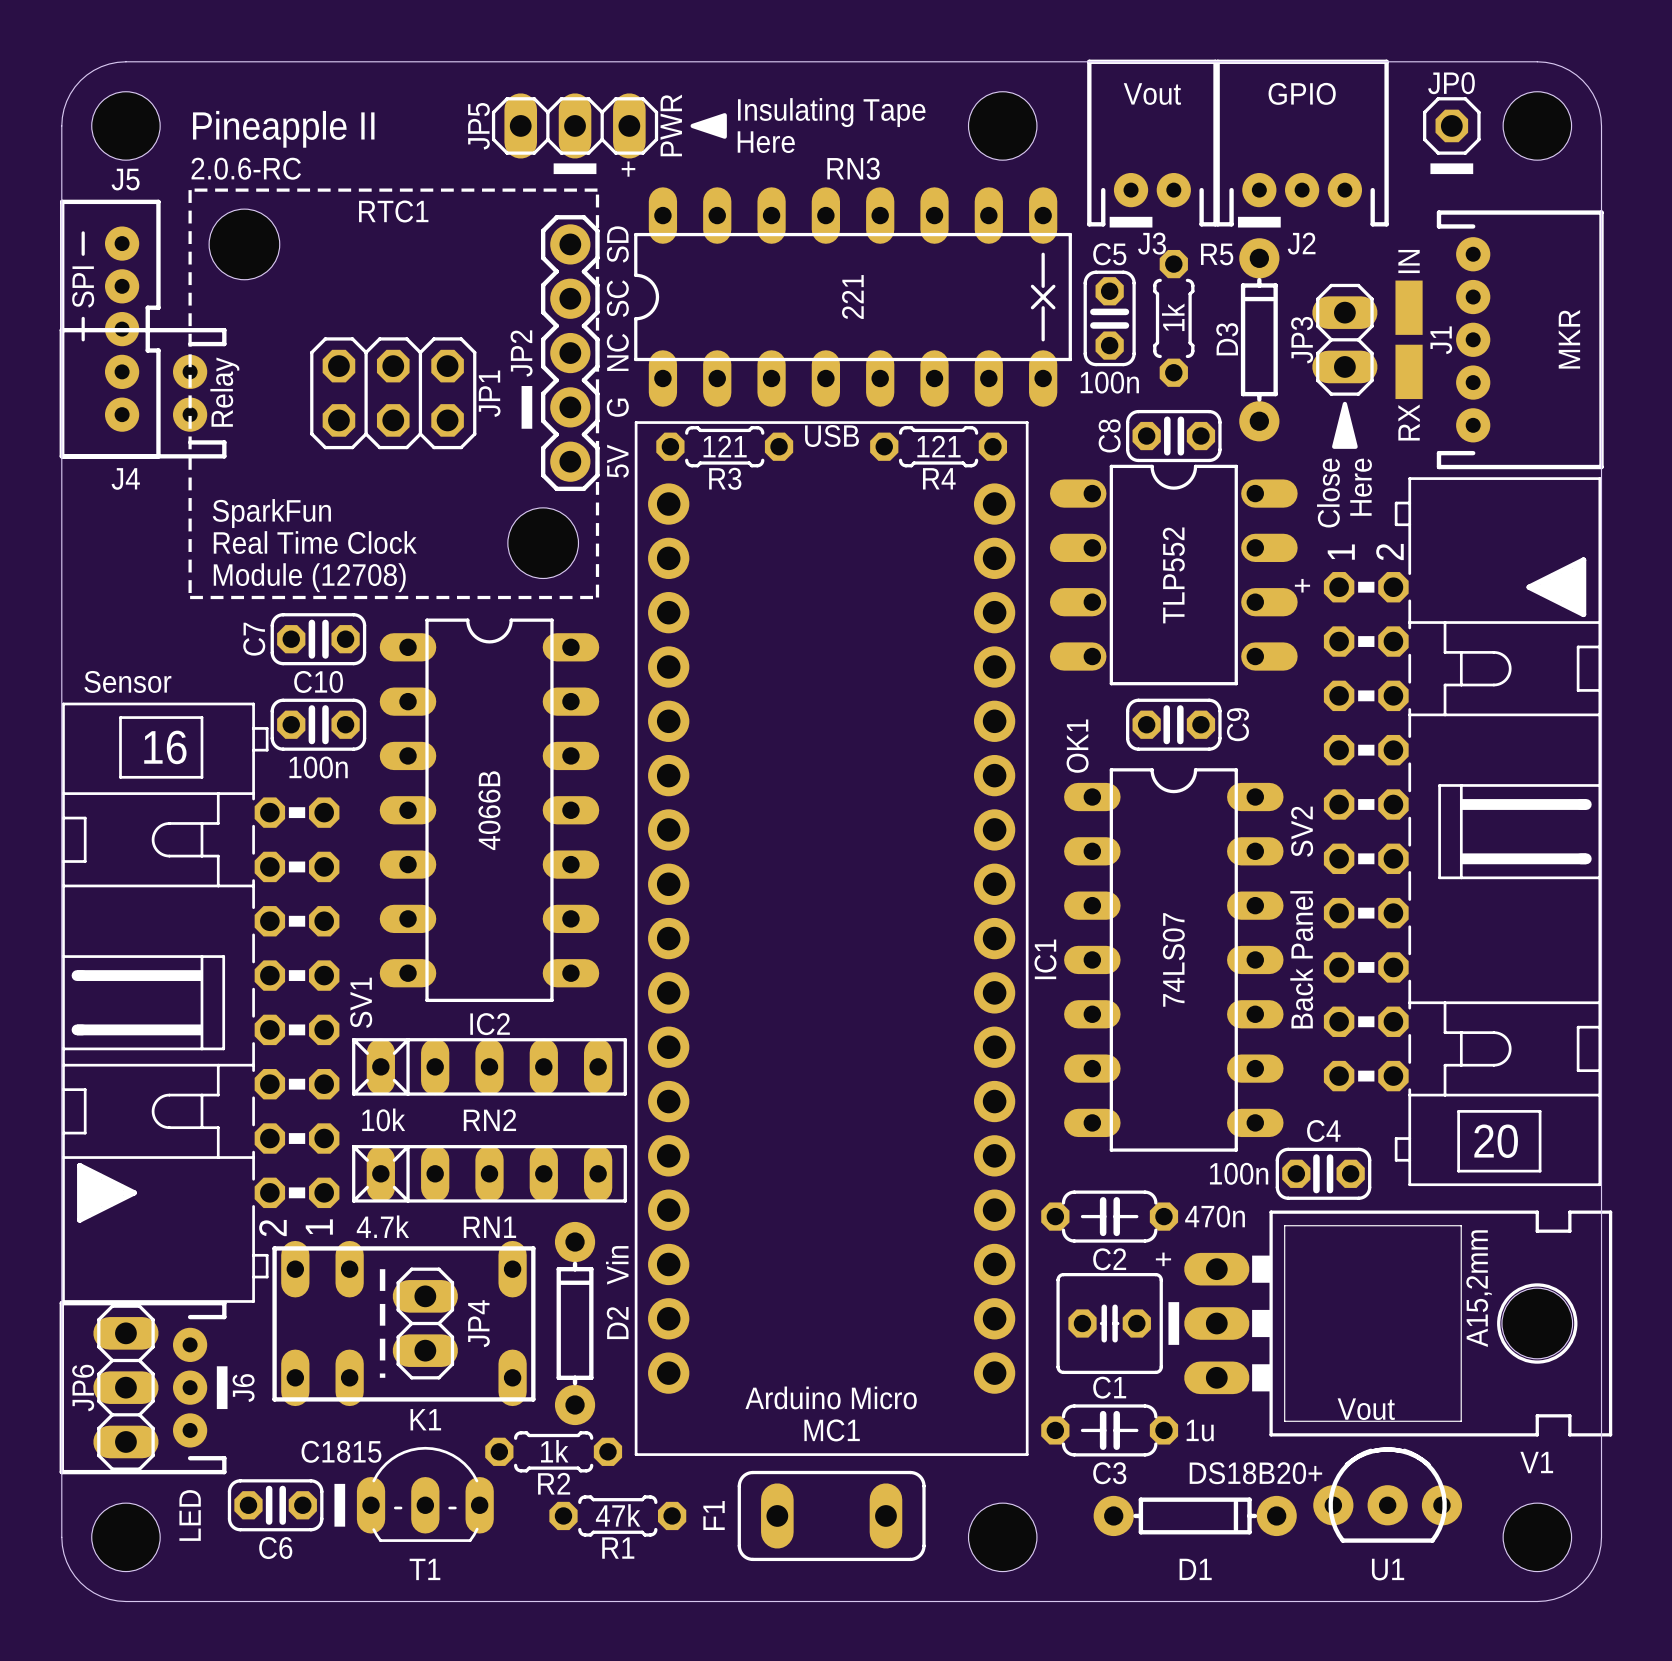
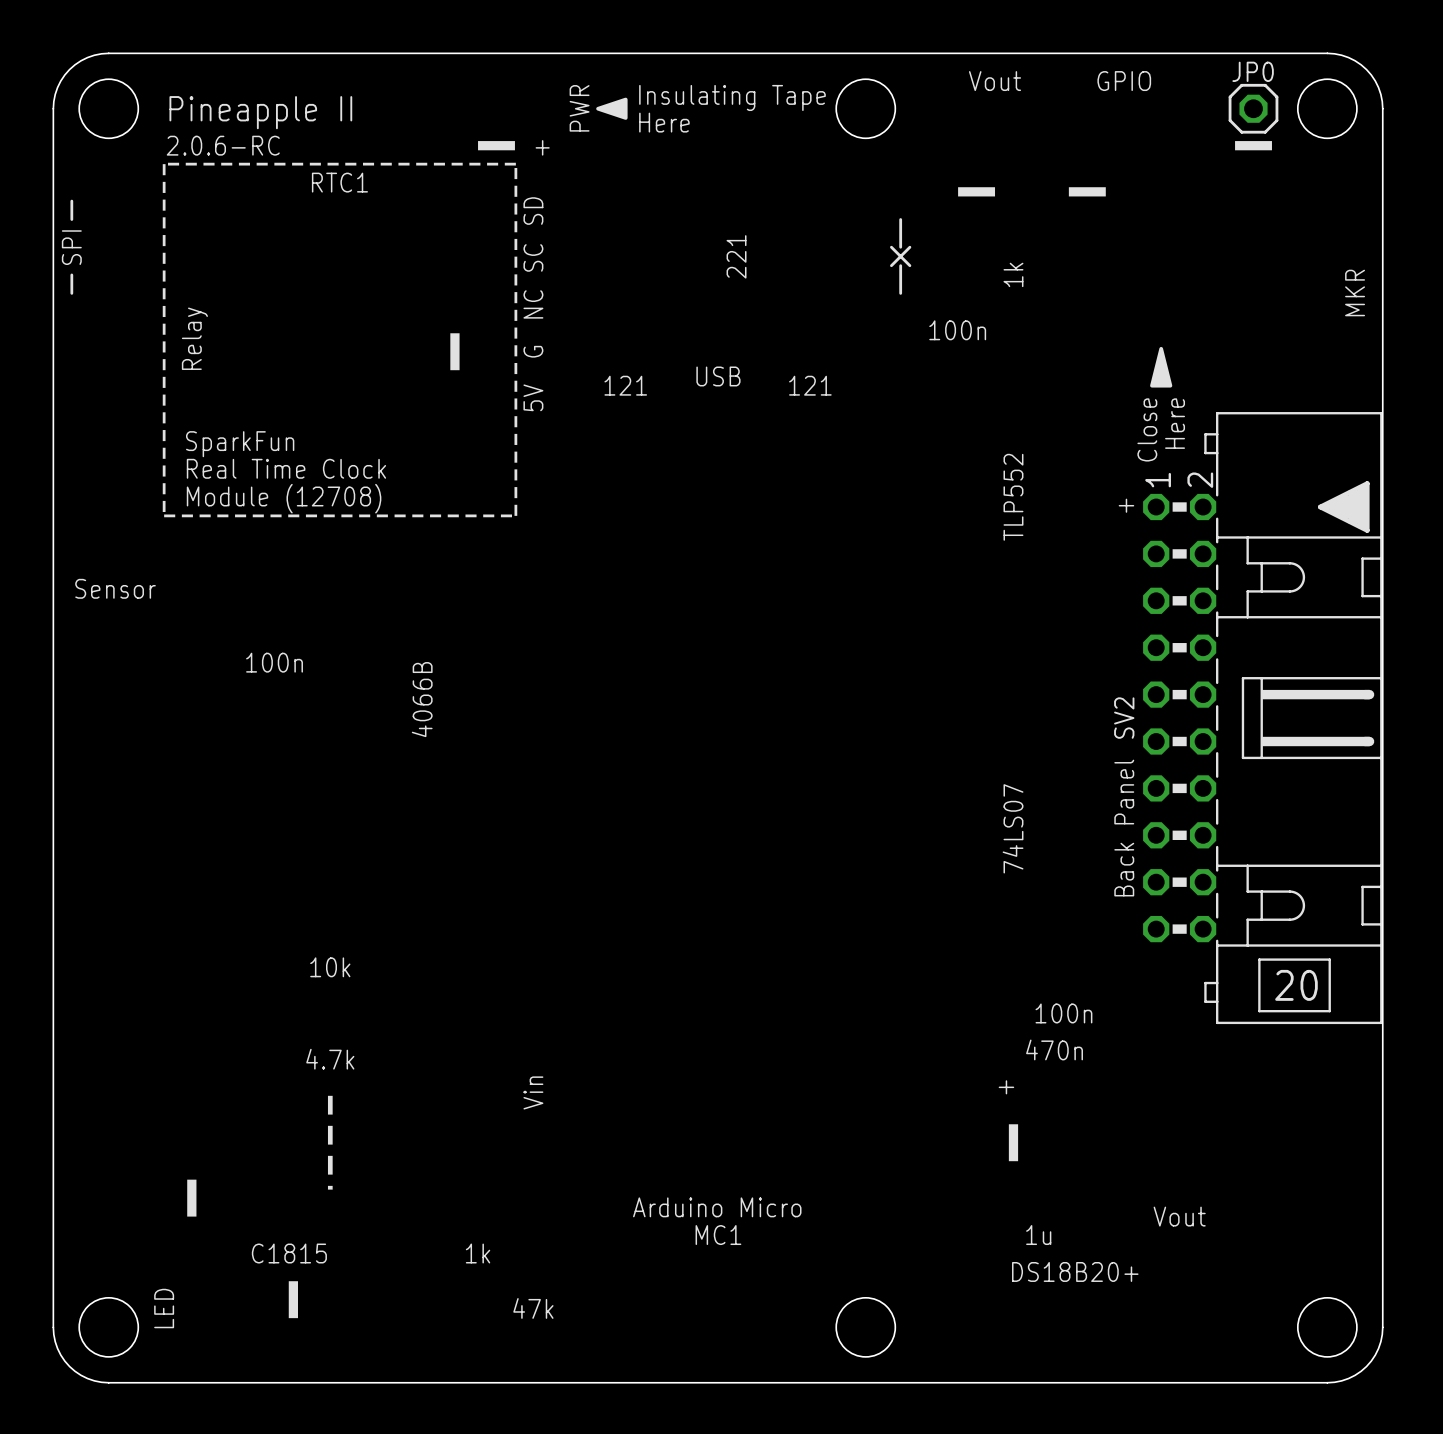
JP5: (575, 125) -> none
J3: (1152, 143) -> none
J2: (1302, 143) -> none
part: (244, 244) -> none
RN3: (853, 297) -> none
IN: (1409, 307) -> none
C5: (1109, 318) -> none
R5: (1173, 318) -> none
J5: (110, 329) -> none
D3: (1259, 339) -> none
JP3: (1344, 339) -> none
J1: (1520, 339) -> none
JP2: (570, 353) -> none
RX: (1409, 371) -> none
J4: (143, 393) -> none
JP1: (393, 393) -> none
C8: (1173, 436) -> none
R3: (724, 446) -> none
R4: (938, 446) -> none
part: (543, 543) -> none
OK1: (1173, 575) -> none
C7: (318, 639) -> none
C10: (318, 724) -> none
C9: (1173, 724) -> none
IC2: (489, 810) -> none
part: (831, 938) -> none
IC1: (1173, 959) -> none
SV1: (200, 1002) -> none
RN2: (489, 1066) -> none
RN1: (489, 1173) -> none
C4: (1323, 1173) -> none
C2: (1109, 1216) -> none
K1: (403, 1323) -> none
JP4: (425, 1323) -> none
D2: (575, 1323) -> none
C1: (1109, 1323) -> none
V1: (1398, 1323) -> none
JP6: (125, 1387) -> none
J6: (143, 1387) -> none
C3: (1109, 1430) -> none
R2: (553, 1451) -> none
T1: (425, 1494) -> none
U1: (1387, 1495) -> none
C6: (275, 1505) -> none
R1: (617, 1515) -> none
F1: (831, 1515) -> none
D1: (1195, 1515) -> none

